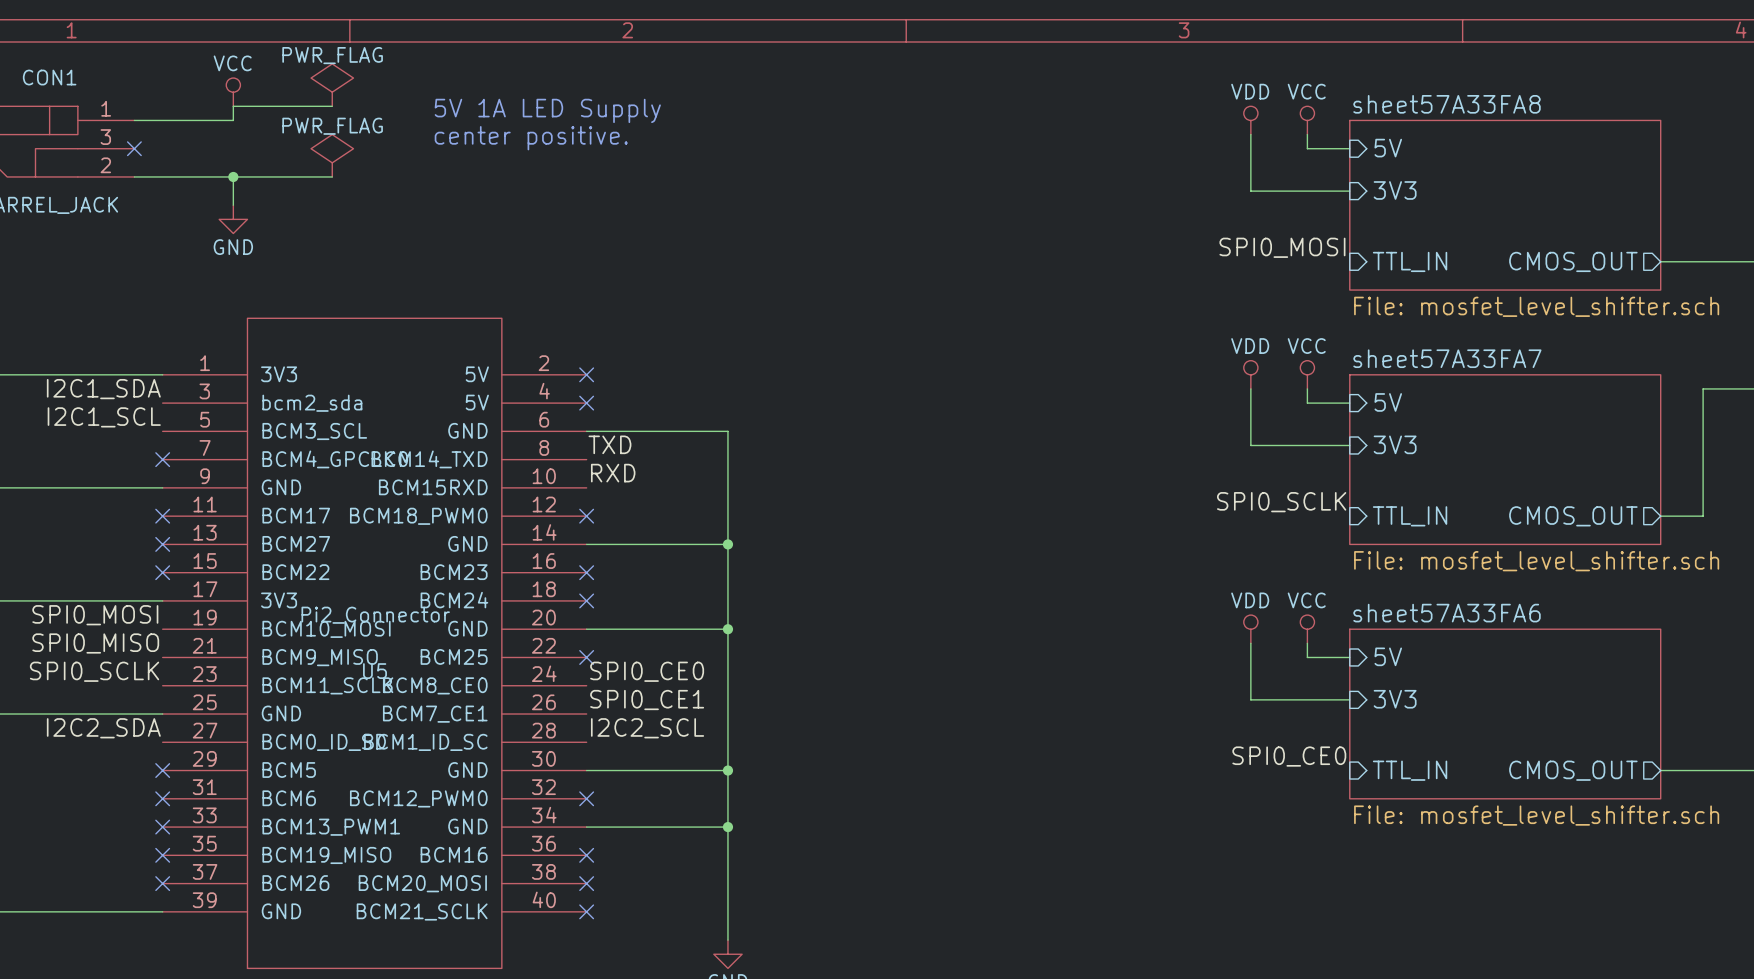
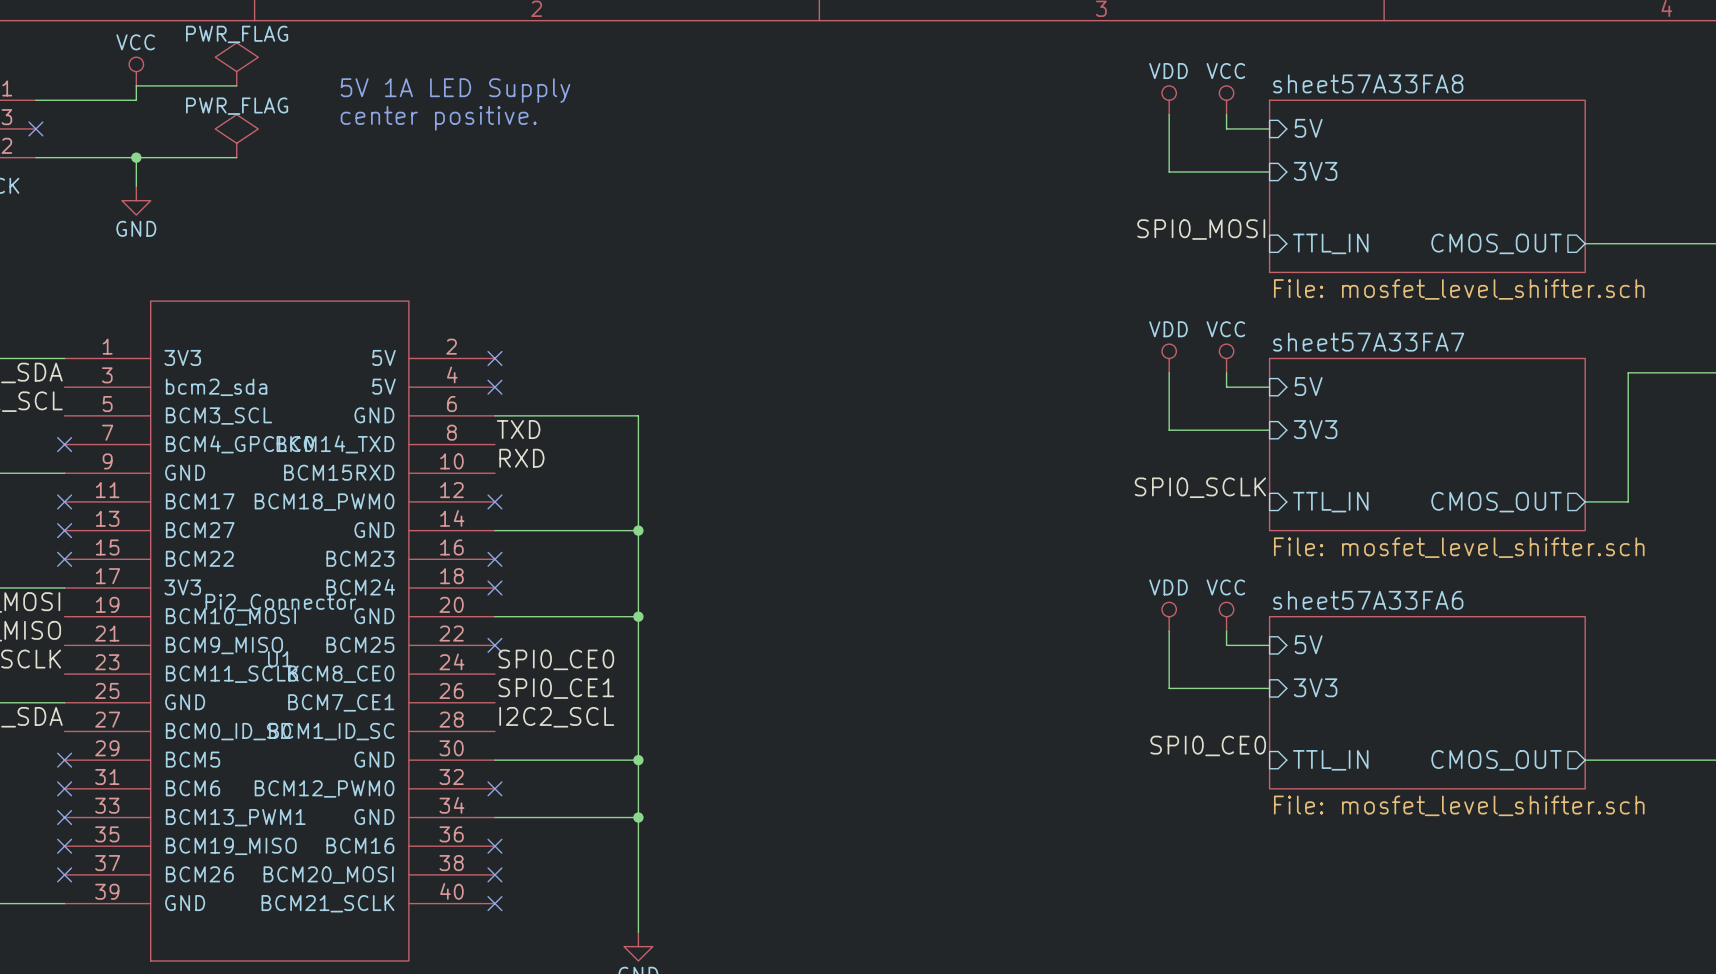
U5 name: U5 (375, 671) -> U1 (280, 659)

